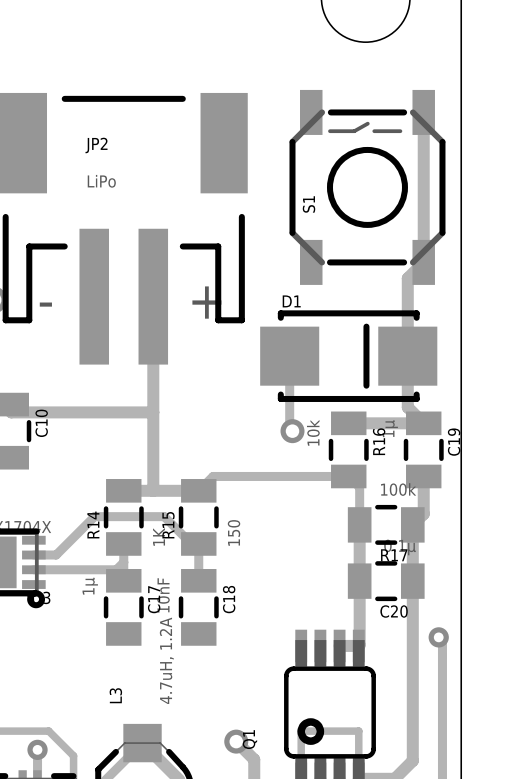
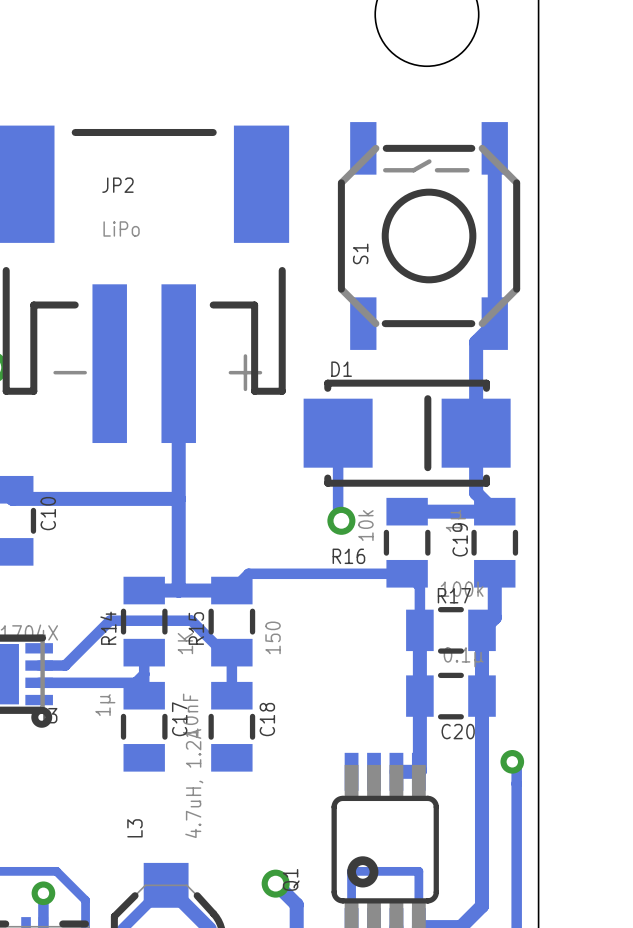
R16 name rotation: 0° (379, 441) -> 90° clockwise (348, 556)
R16 name position: R16 (379, 441) -> R16 (348, 556)
C19 name position: C19 (454, 442) -> C19 (460, 539)
R17 name position: R17 (394, 555) -> R17 (454, 595)

